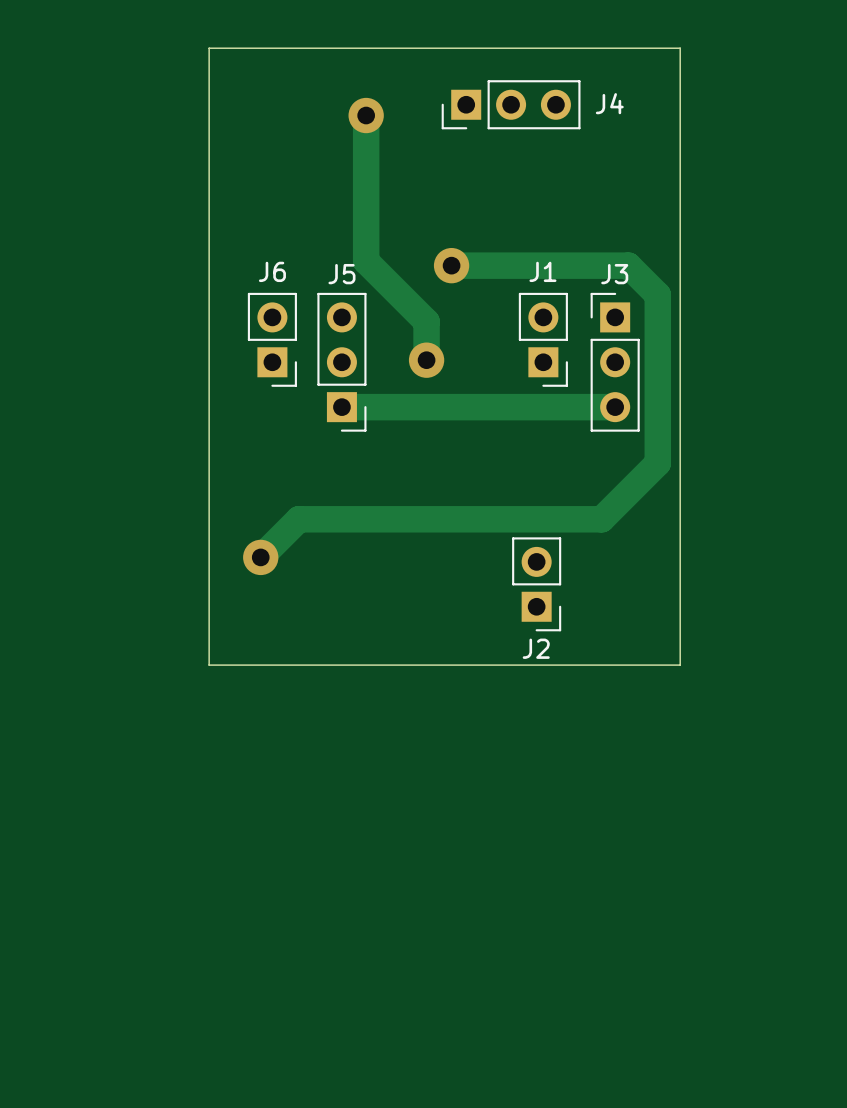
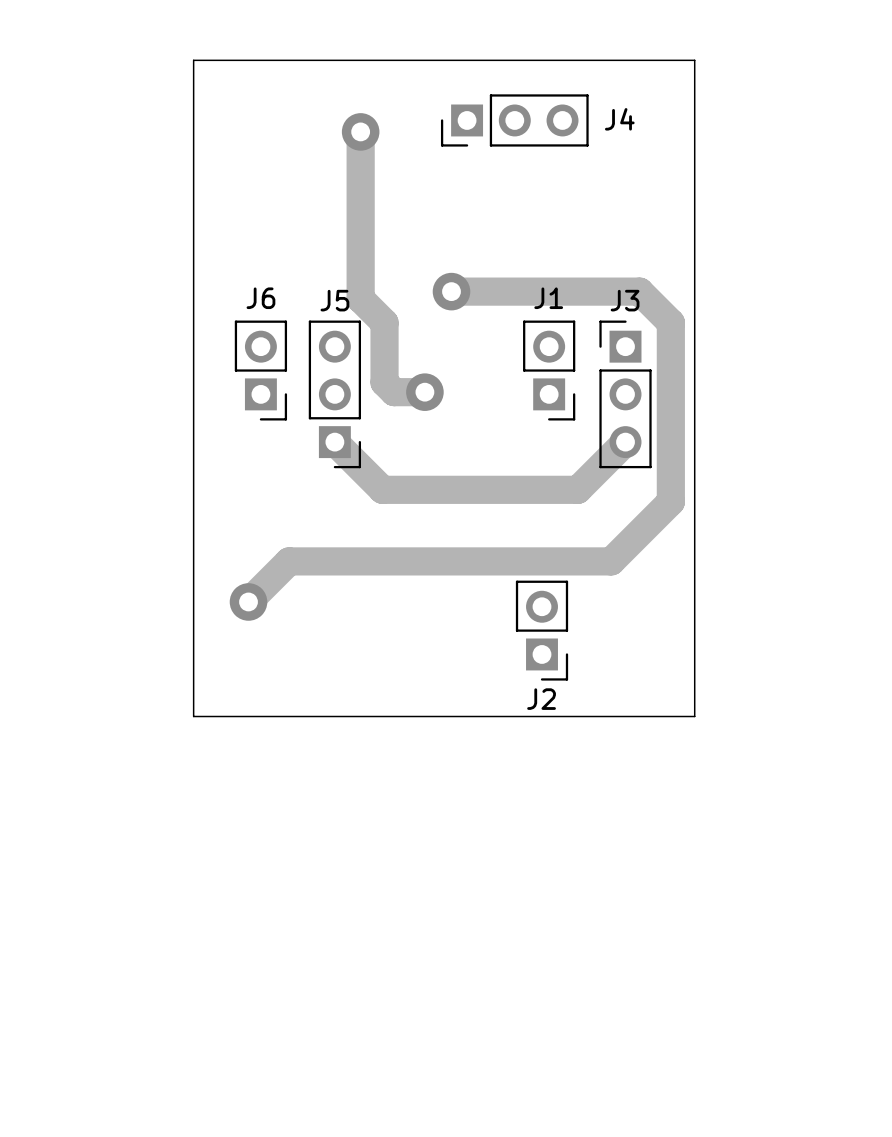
track: (366, 261) (426, 321) (426, 360) -> (360, 287) (360, 298) (384, 322) (384, 382) (394, 392) (424, 392)
track: (615, 407) (341, 407) -> (625, 442) (577, 489) (382, 489) (334, 442)

